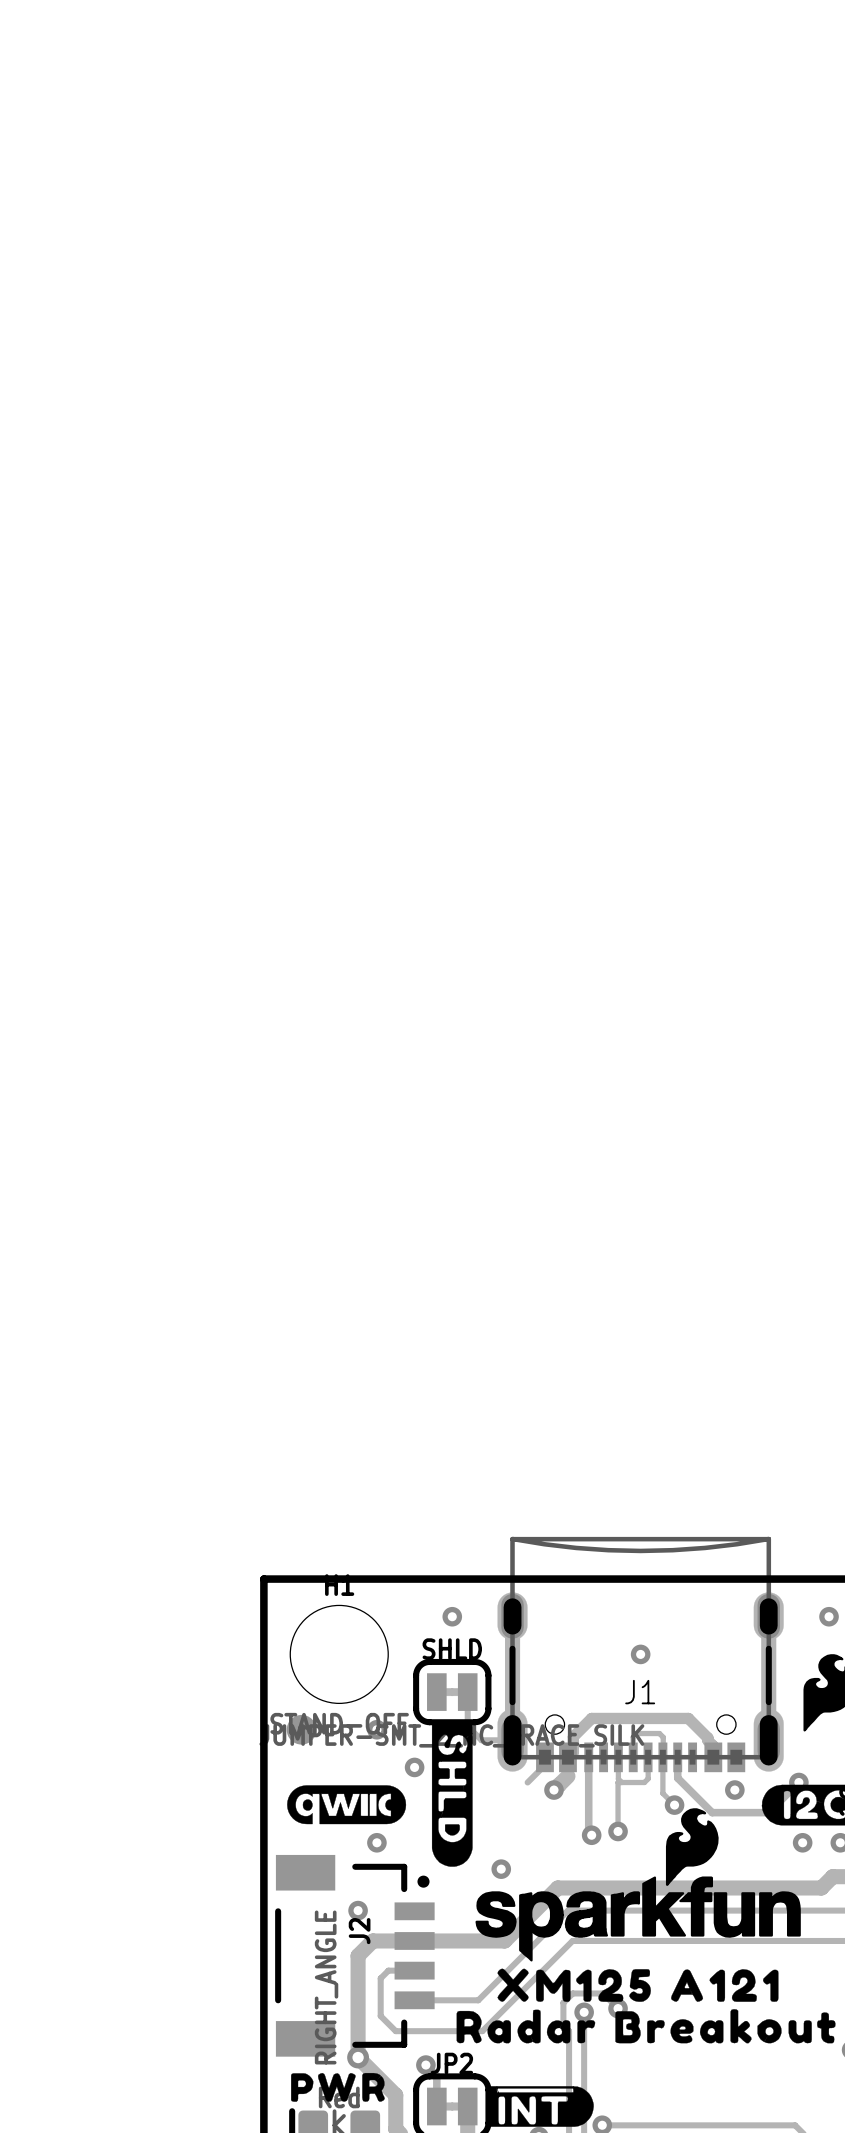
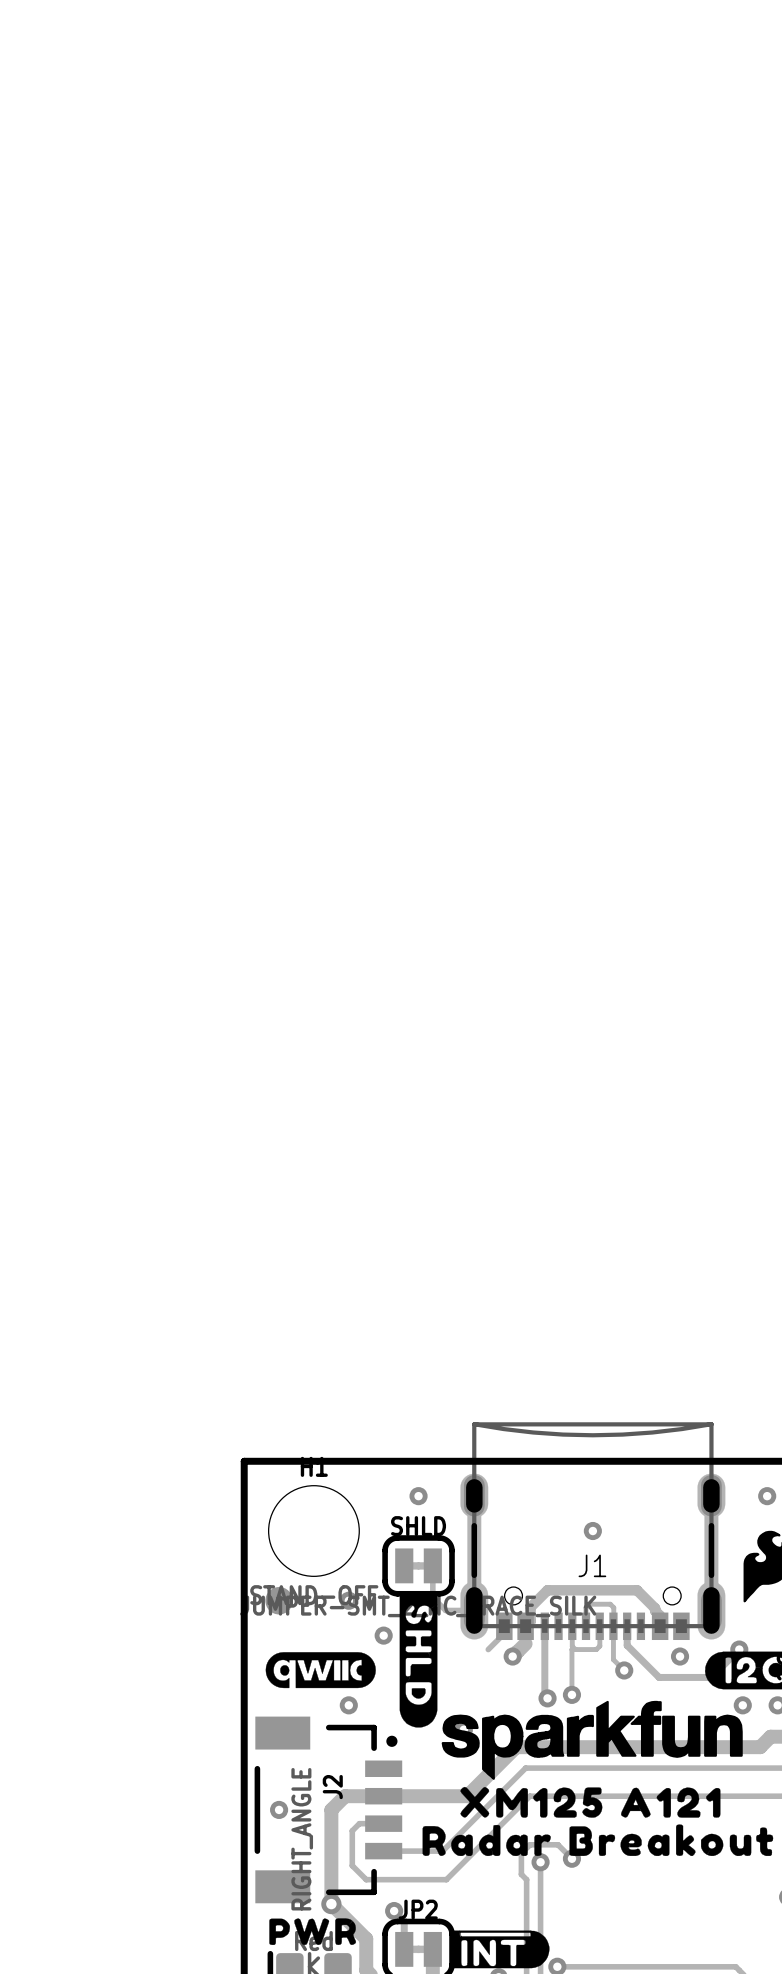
drawing shape: [475, 1808, 801, 1962] -> [441, 1700, 743, 1780]
via position: (358, 1910) -> (279, 1809)
drawing position: (637, 1985) -> (590, 1802)
drawing position: (646, 2026) -> (597, 1840)

